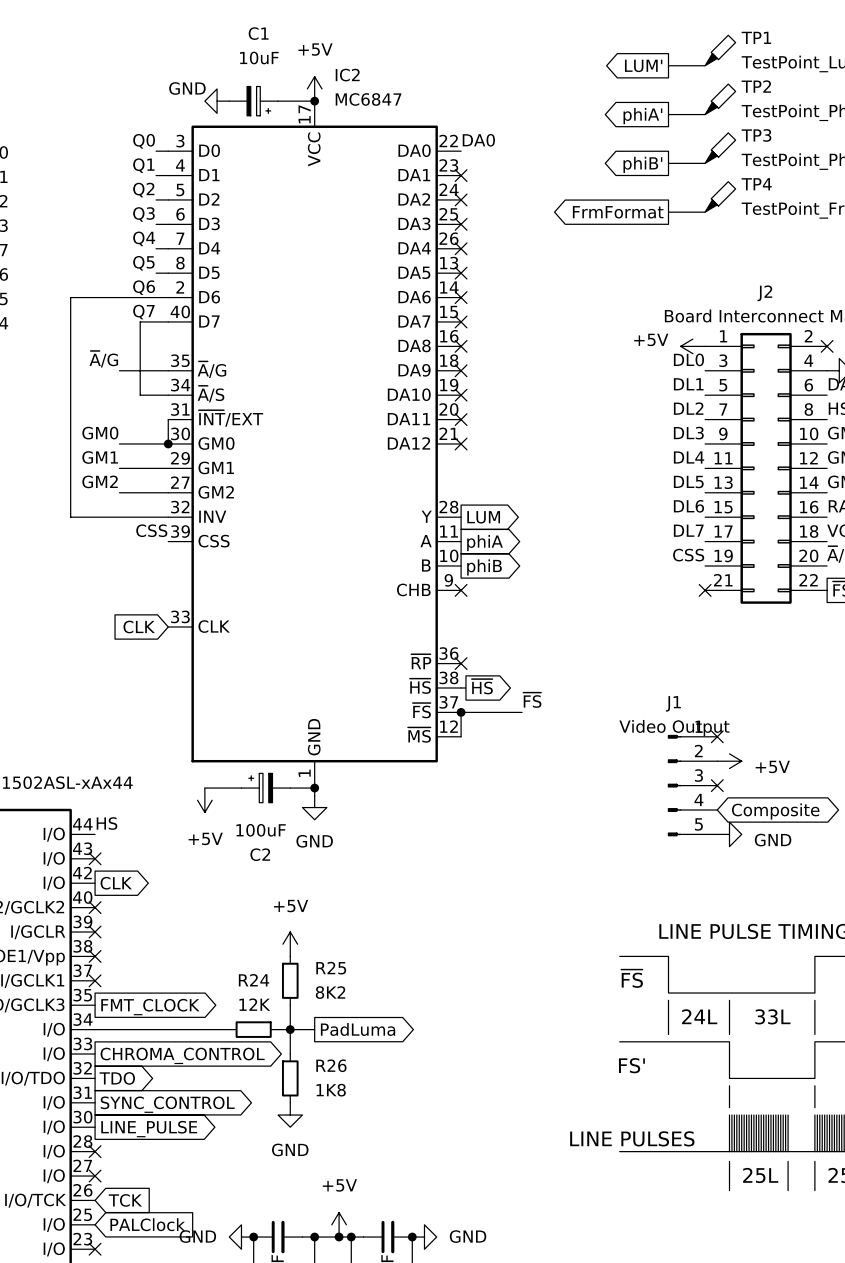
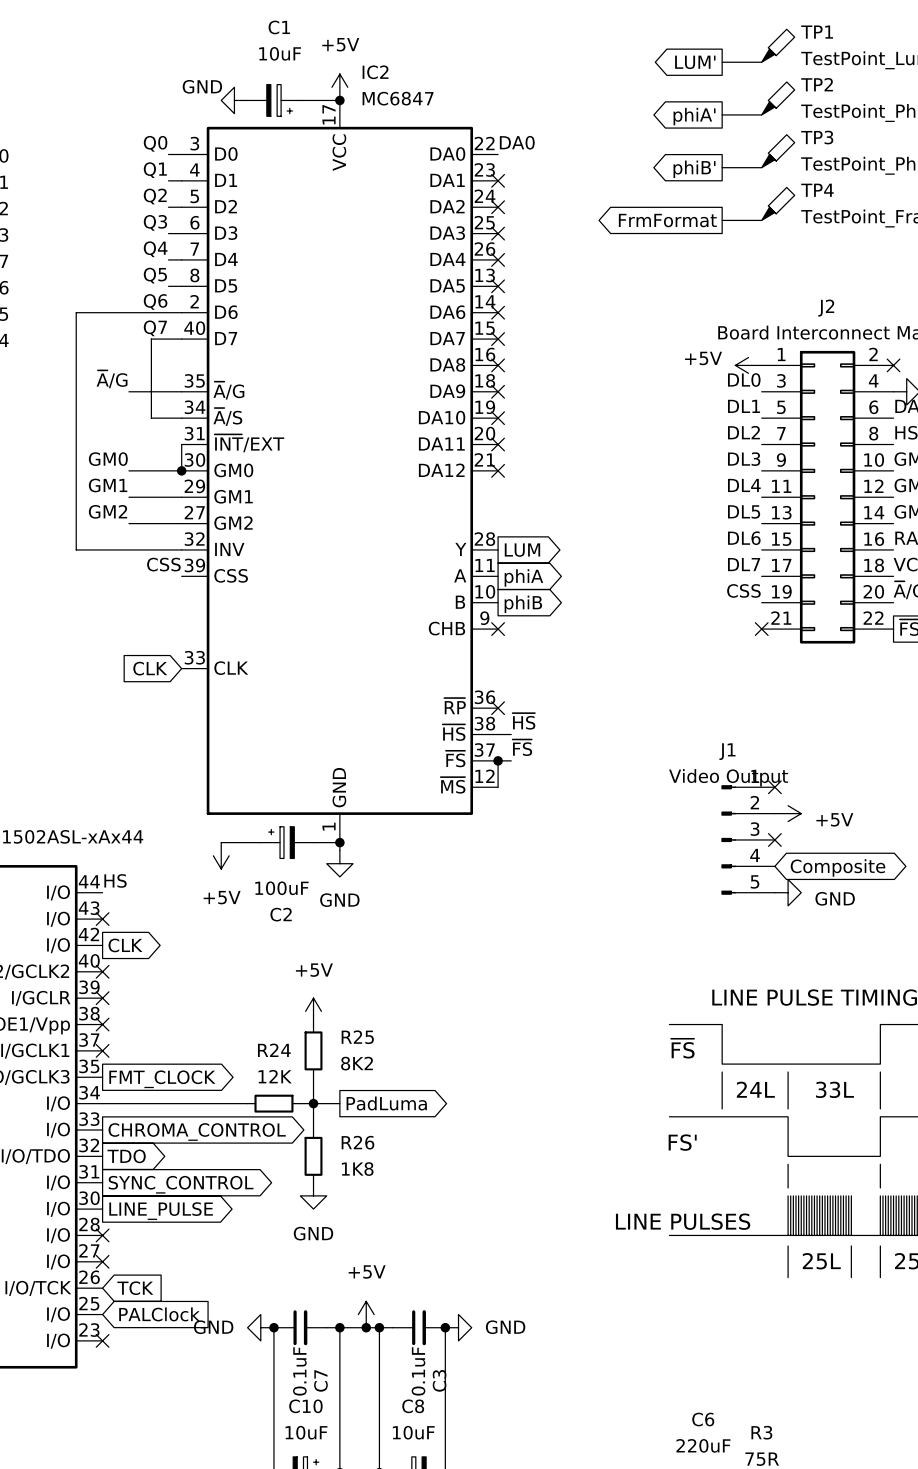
label: none -> ~{HS} (523, 721)
global label: ~{HS} (482, 686) -> none
wire: none -> (503, 734) (511, 734)
label position: ~{FS} (532, 700) -> ~{FS} (522, 747)
wire: (473, 712) (522, 712) -> none

